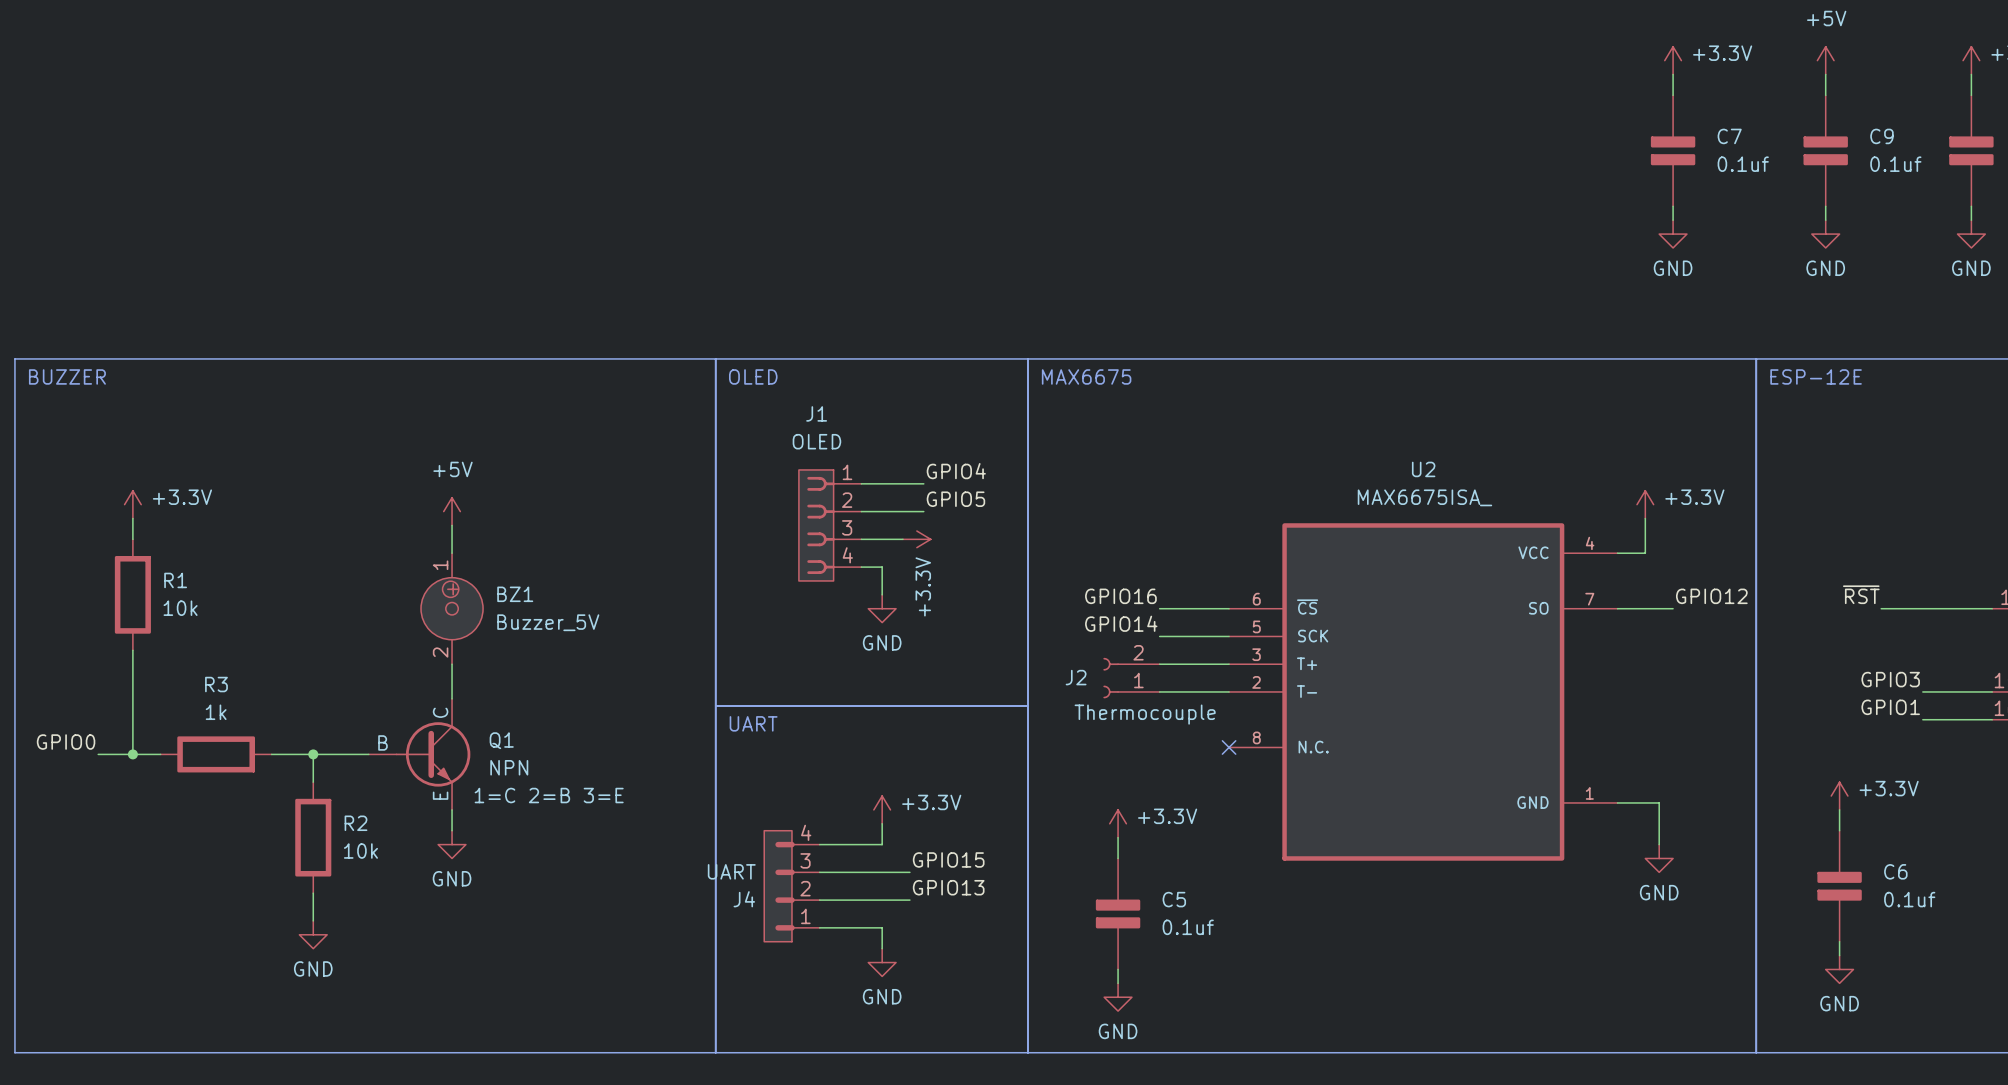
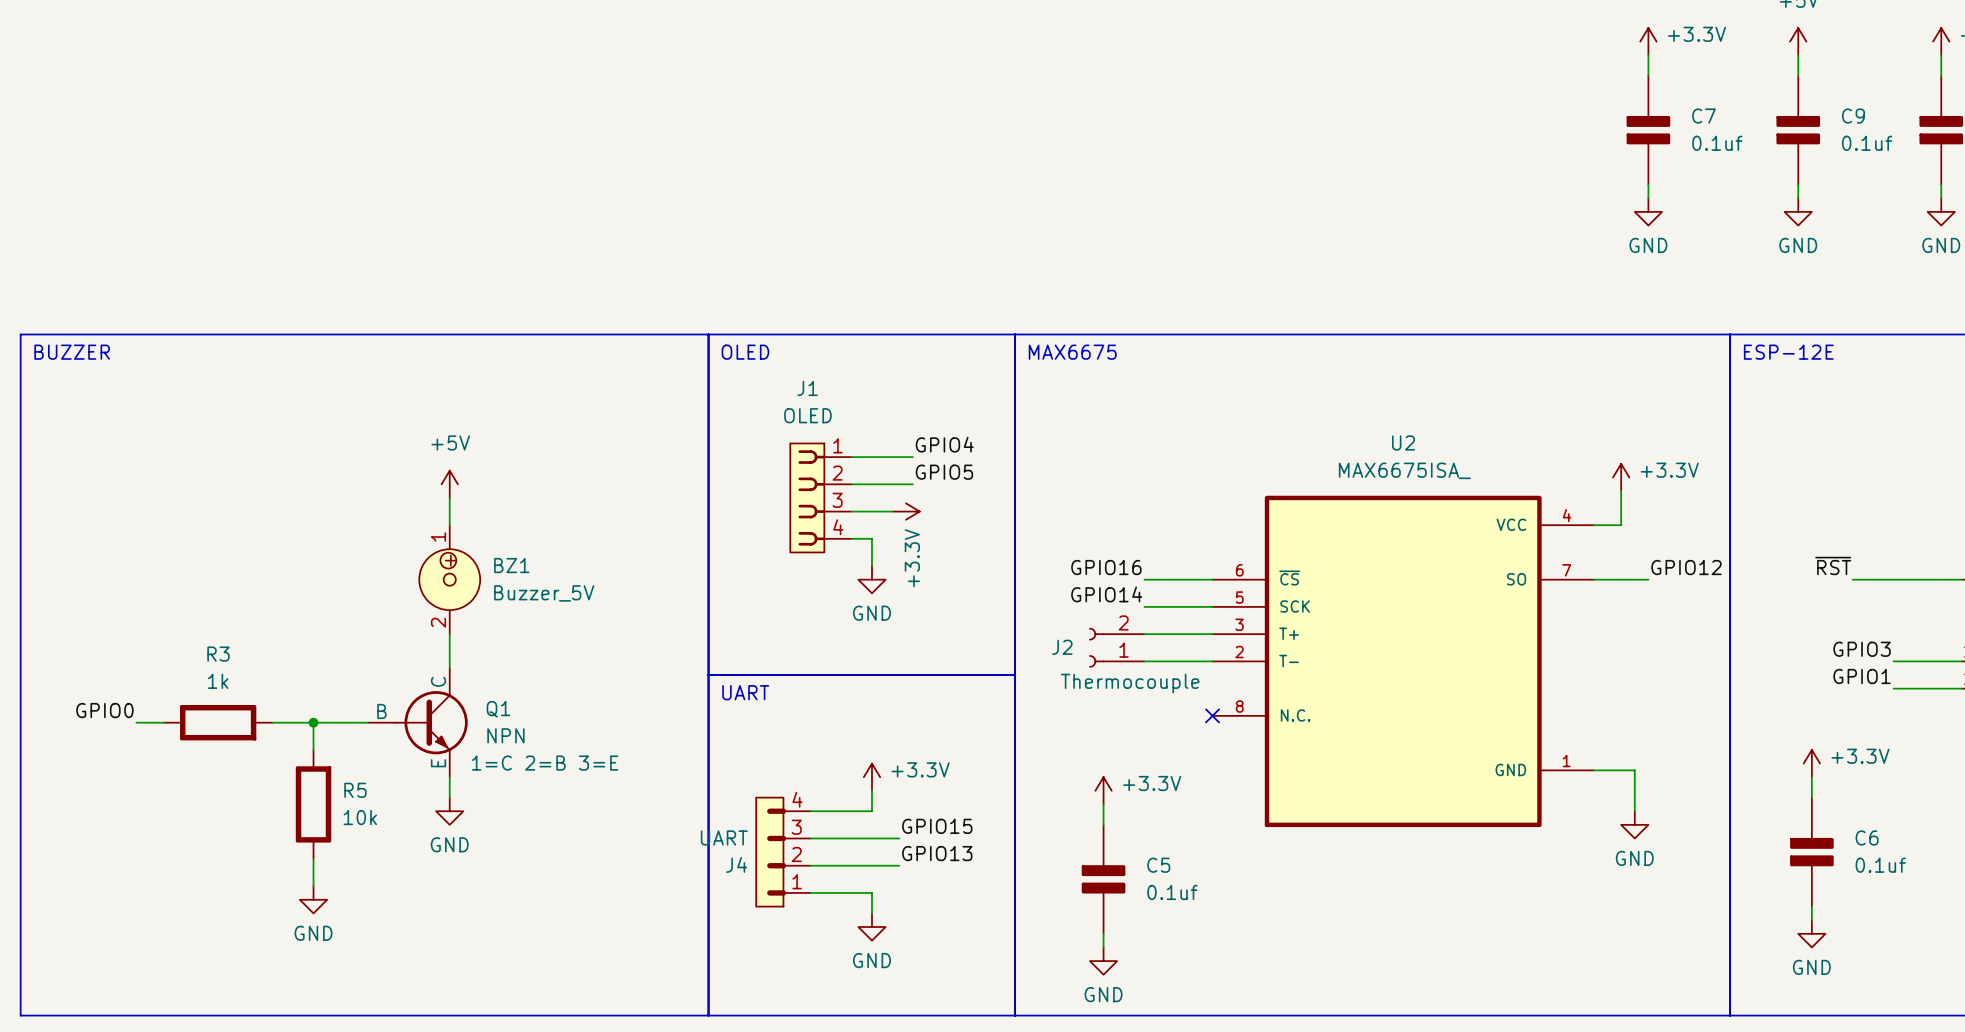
power symbol: +3.3V (132, 504) -> none
wire: (132, 518) (132, 539) -> none
R1: 10k (132, 594) -> none
wire: (132, 650) (132, 754) (98, 754) -> none
label position: GPIO0 (66, 742) -> GPIO0 (104, 710)
junction: (132, 754) -> none
R2 name: R2 (356, 823) -> R5 (355, 790)

